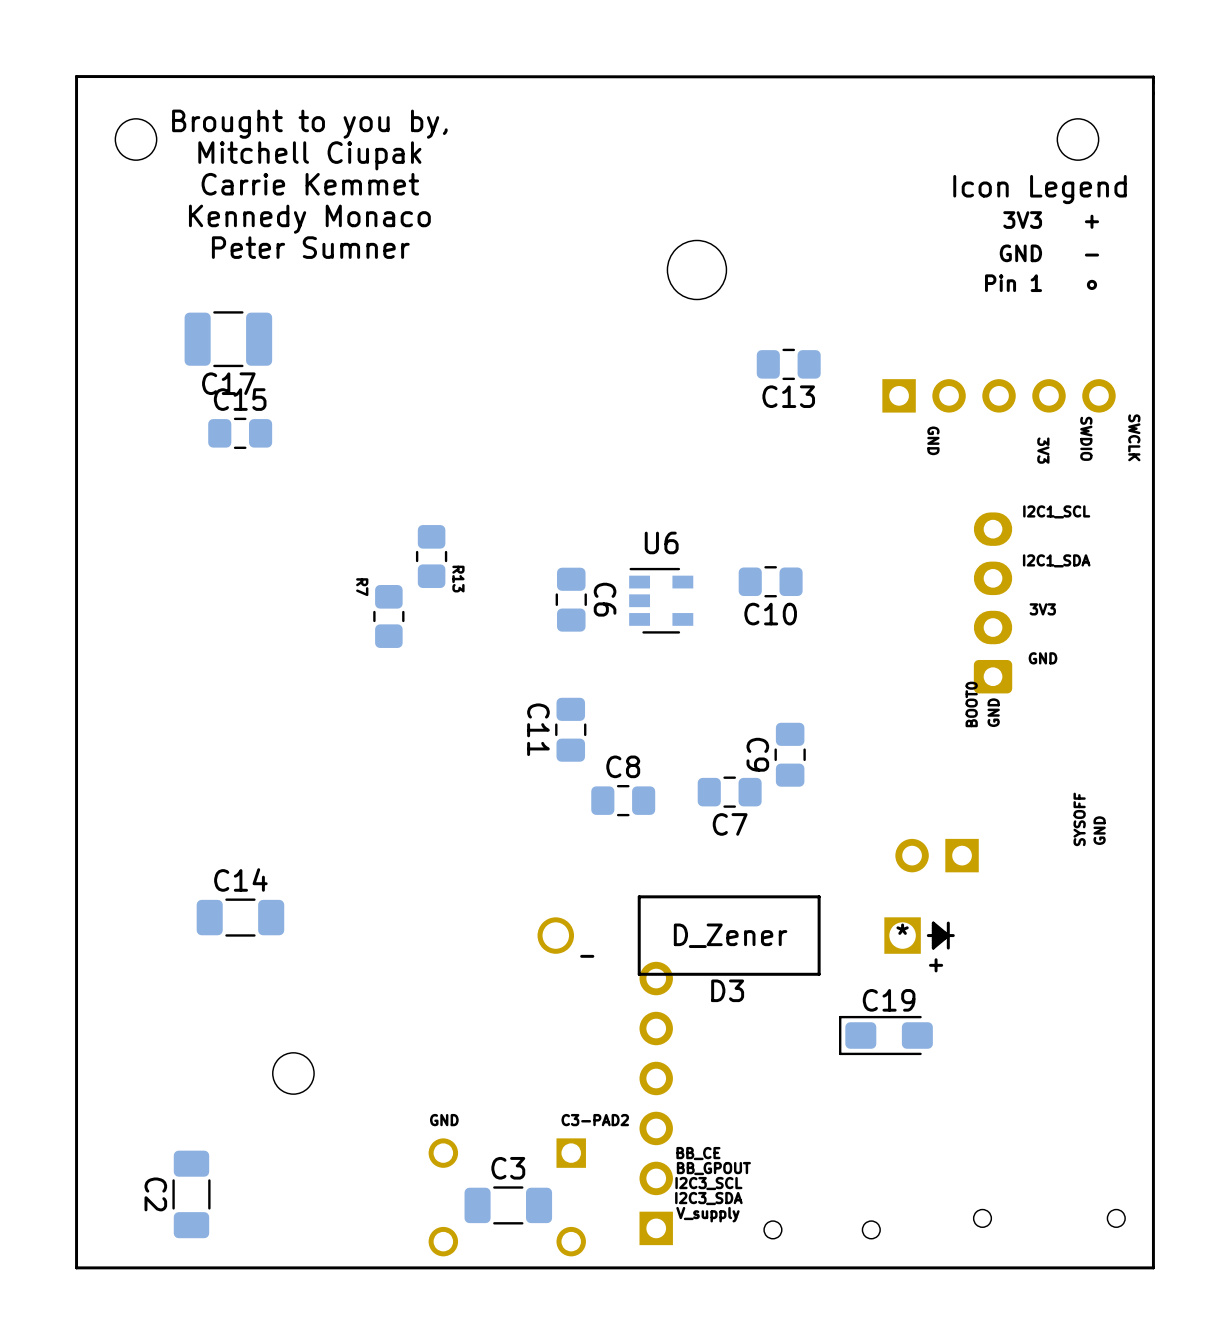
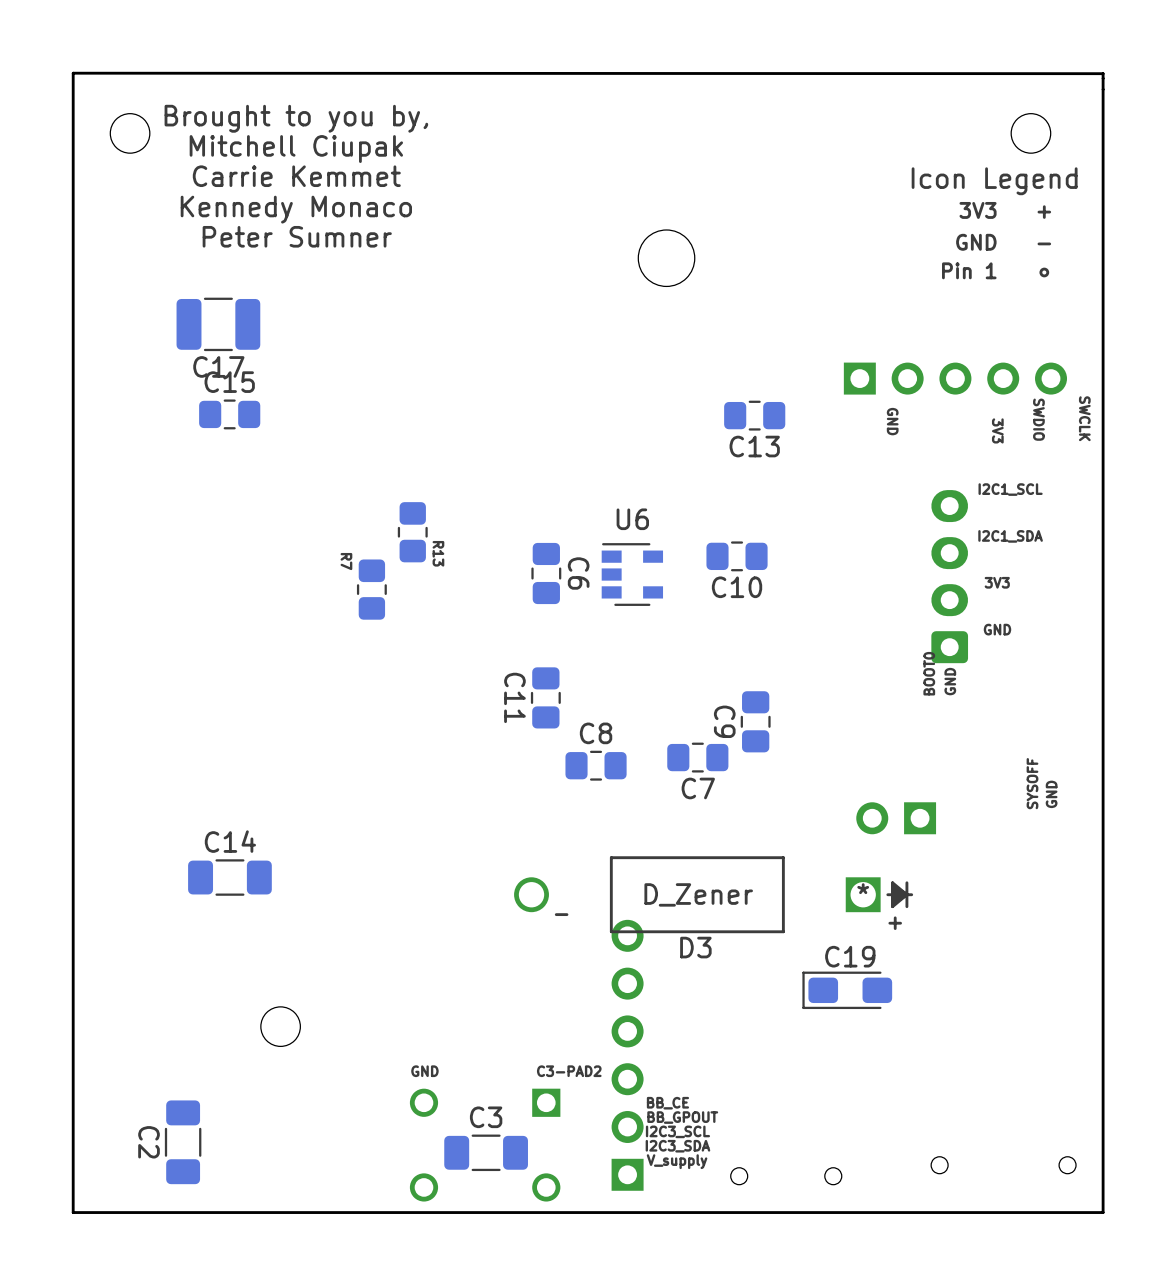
C13 position: (788, 364) -> (754, 415)

